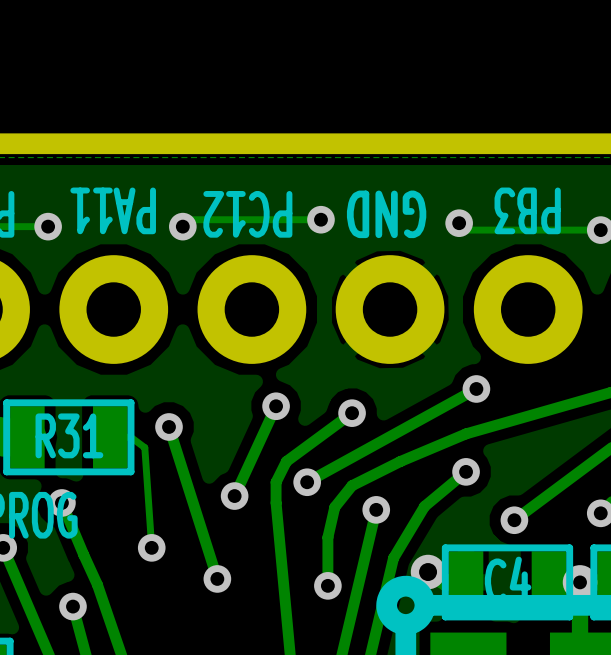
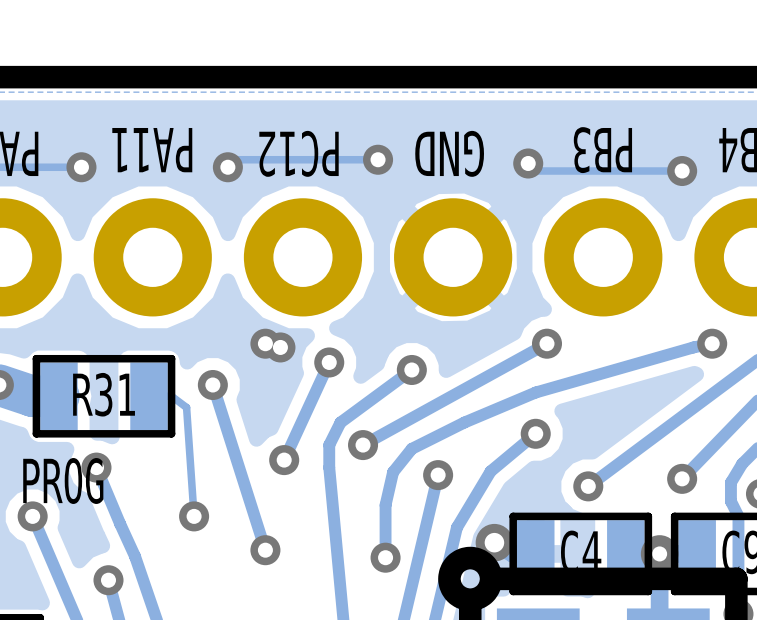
via: none -> (265, 343)
via: none -> (280, 347)

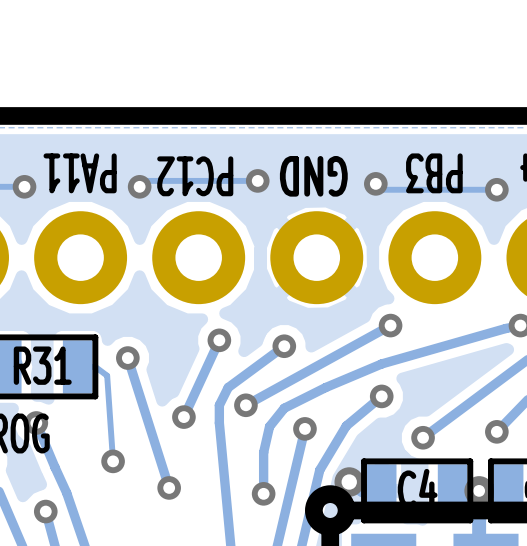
via: (265, 343) -> none
via: (280, 347) -> none

